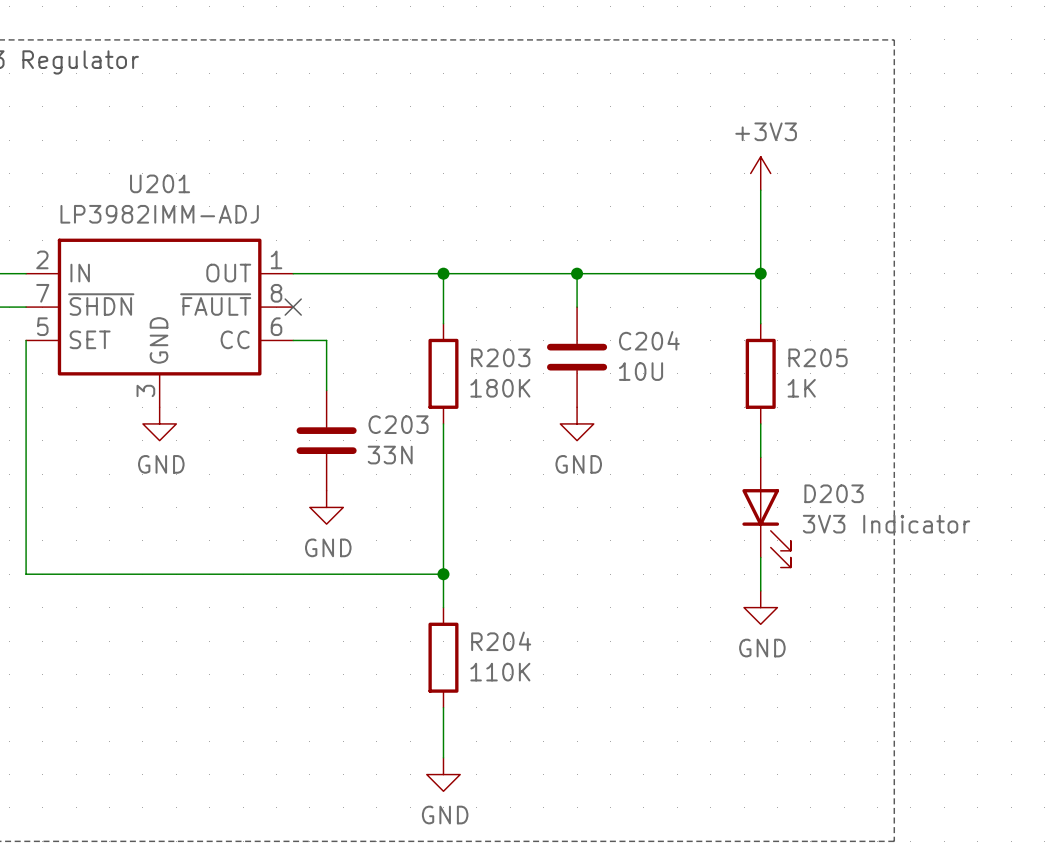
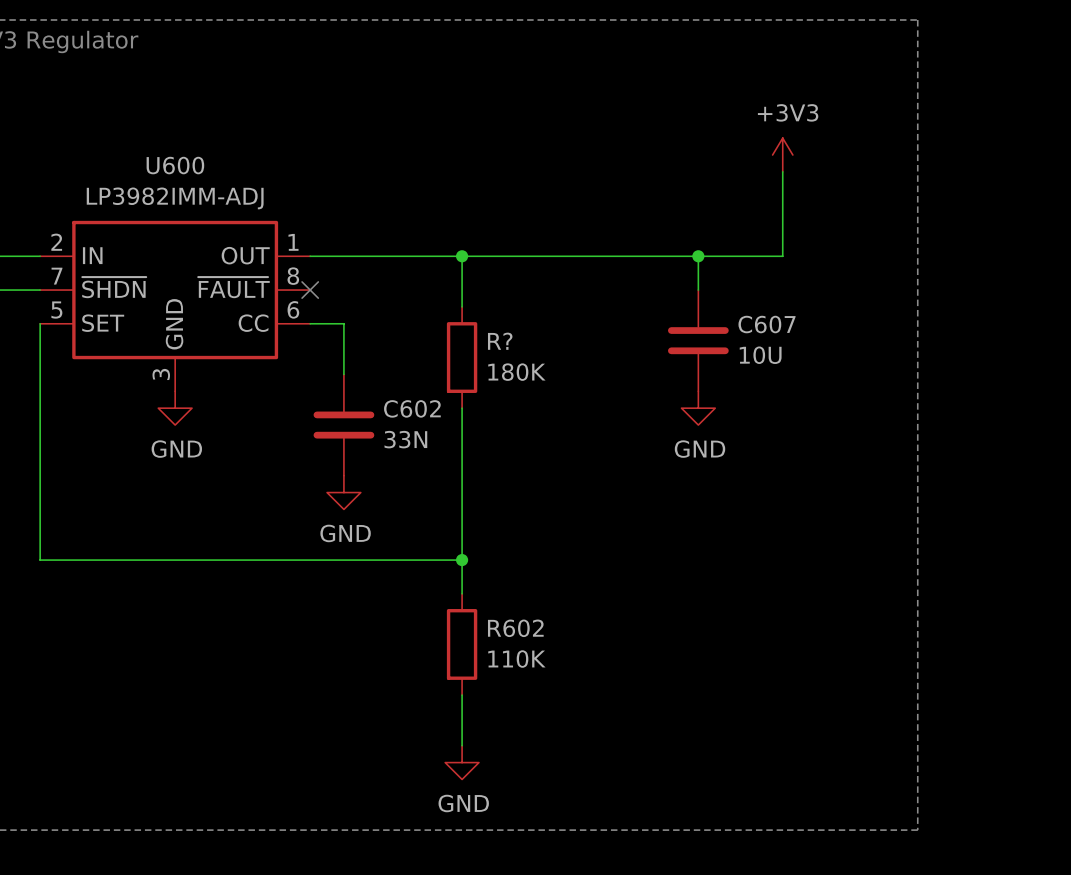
U201 name: U201 (160, 183) -> U600 (175, 165)
wire: (577, 273) (577, 307) -> (698, 256) (698, 290)
junction: (577, 273) -> none
junction: none -> (698, 256)
wire: (760, 273) (760, 323) -> none
junction: (760, 273) -> none
R203 name: R203 (500, 357) -> R? (500, 341)
C204: 10U (577, 357) -> none
C607: none -> 10U (698, 340)
R205: 1K (760, 373) -> none
power symbol position: GND (577, 423) -> GND (698, 408)
wire: (760, 423) (760, 457) -> none
C203 name: C203 (398, 424) -> C602 (412, 408)
D203: 3V3 Indicator (766, 512) -> none
wire: (760, 557) (760, 590) -> none
power symbol: GND (760, 607) -> none
R204 name: R204 (501, 641) -> R602 (515, 628)

